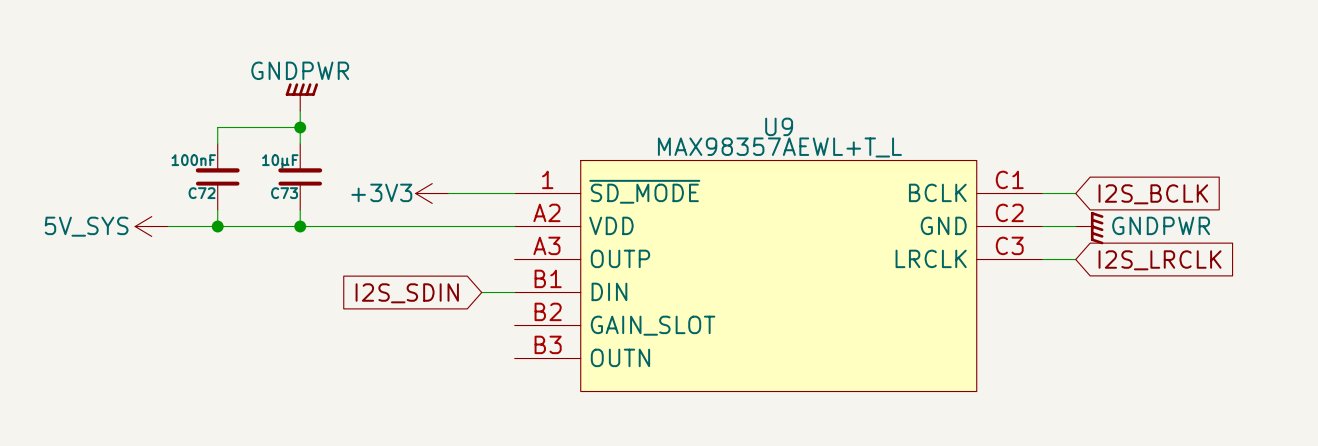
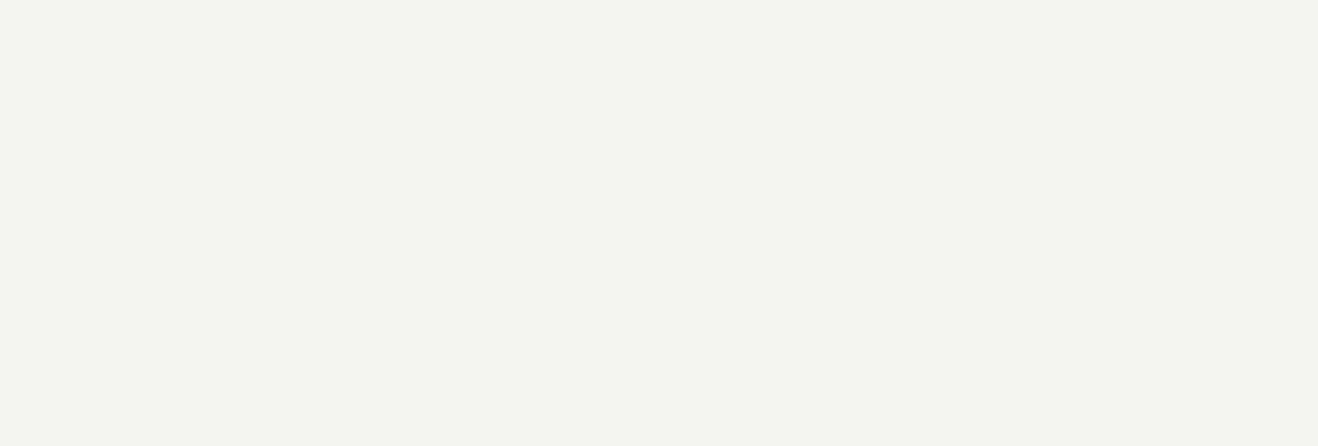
power symbol: GNDPWR (301, 97) -> none
wire: (300, 111) (300, 144) -> none
wire: (300, 127) (217, 127) (217, 144) -> none
junction: (300, 127) -> none
C72: 100nF (217, 177) -> none
C73: 10μF (300, 177) -> none
power symbol: +3V3 (432, 193) -> none
wire: (448, 193) (514, 193) -> none
wire: (1042, 193) (1075, 193) -> none
global label: I2S_BCLK (1153, 194) -> none
wire: (217, 210) (217, 226) -> none
wire: (300, 210) (300, 226) -> none
power symbol: 5V_SYS (151, 226) -> none
wire: (168, 226) (514, 226) -> none
junction: (217, 226) -> none
junction: (300, 226) -> none
wire: (1042, 226) (1075, 226) -> none
power symbol: GNDPWR (1089, 228) -> none
wire: (1042, 259) (1075, 259) -> none
global label: I2S_LRCLK (1160, 260) -> none
U9: MAX98357AEWL+T_L (778, 276) -> none
wire: (481, 292) (514, 292) -> none
global label: I2S_SDIN (407, 293) -> none

